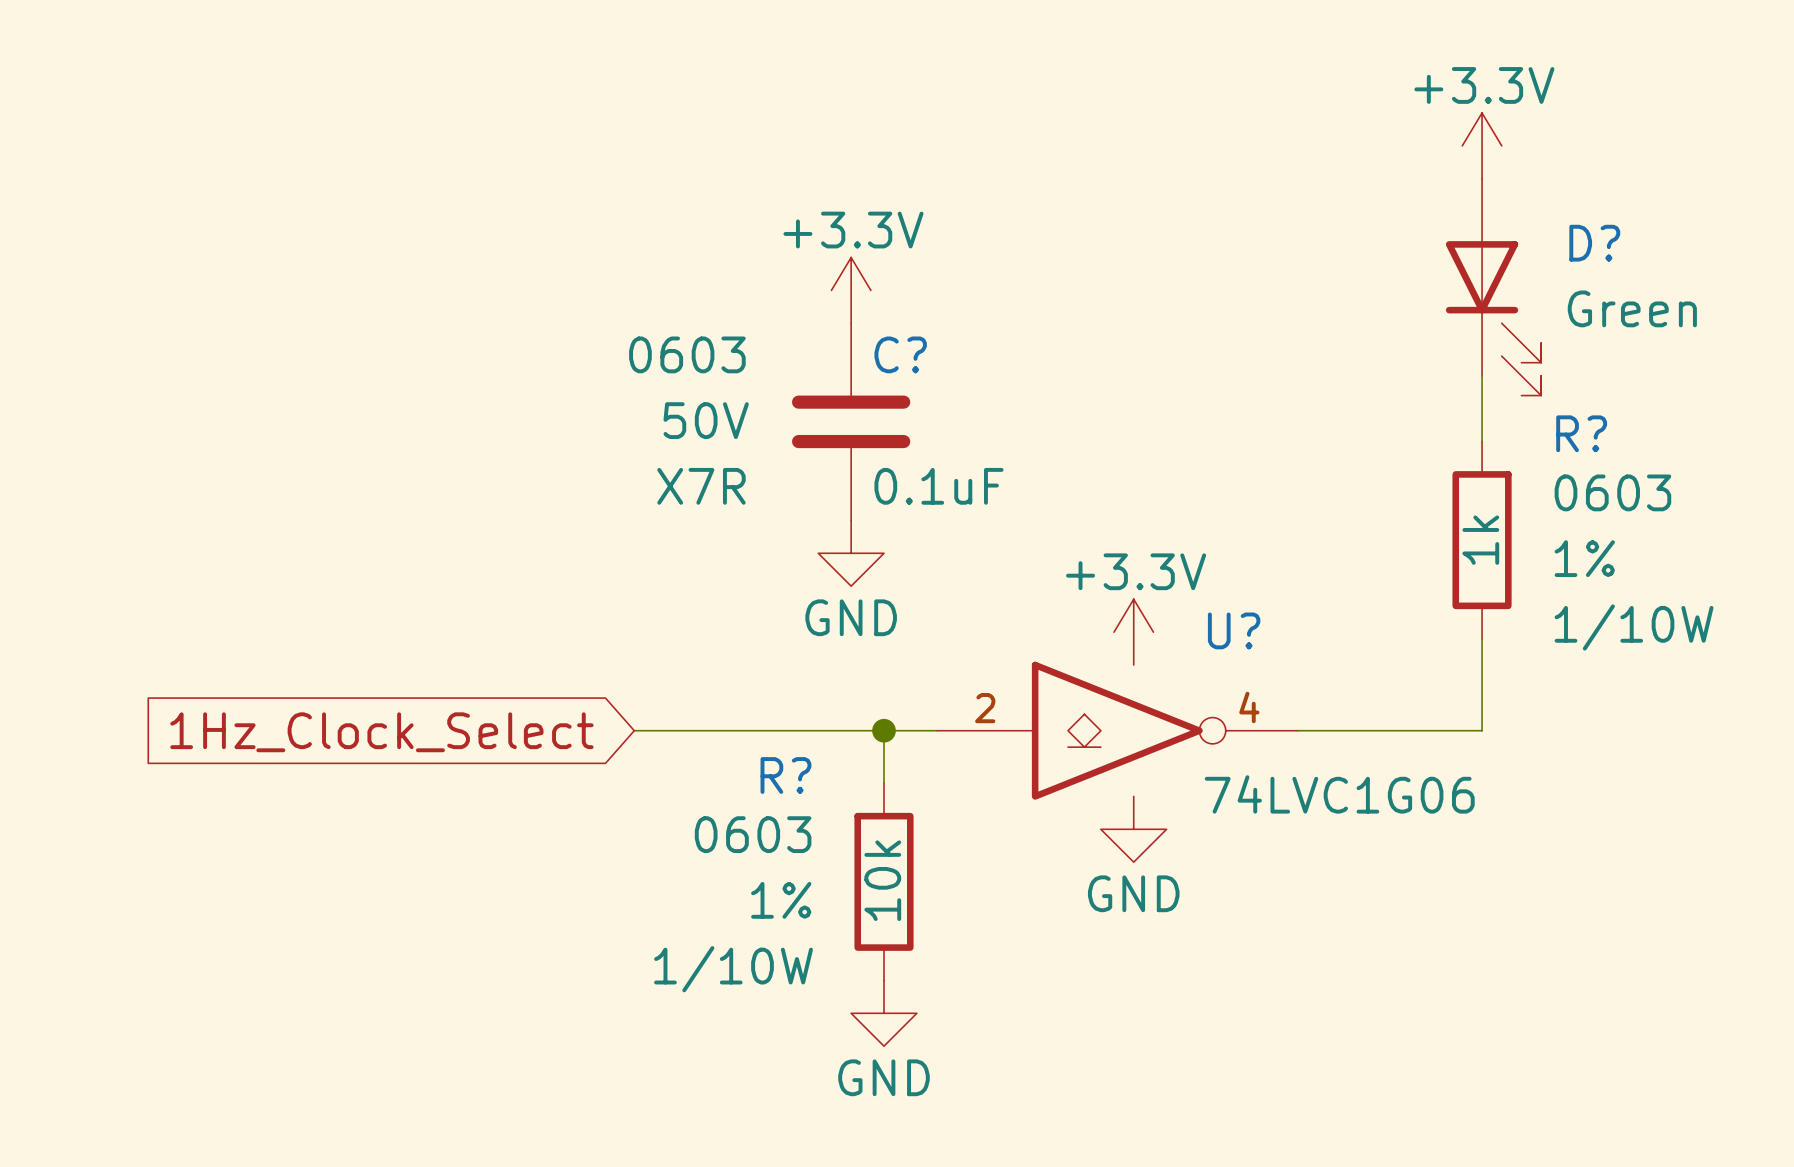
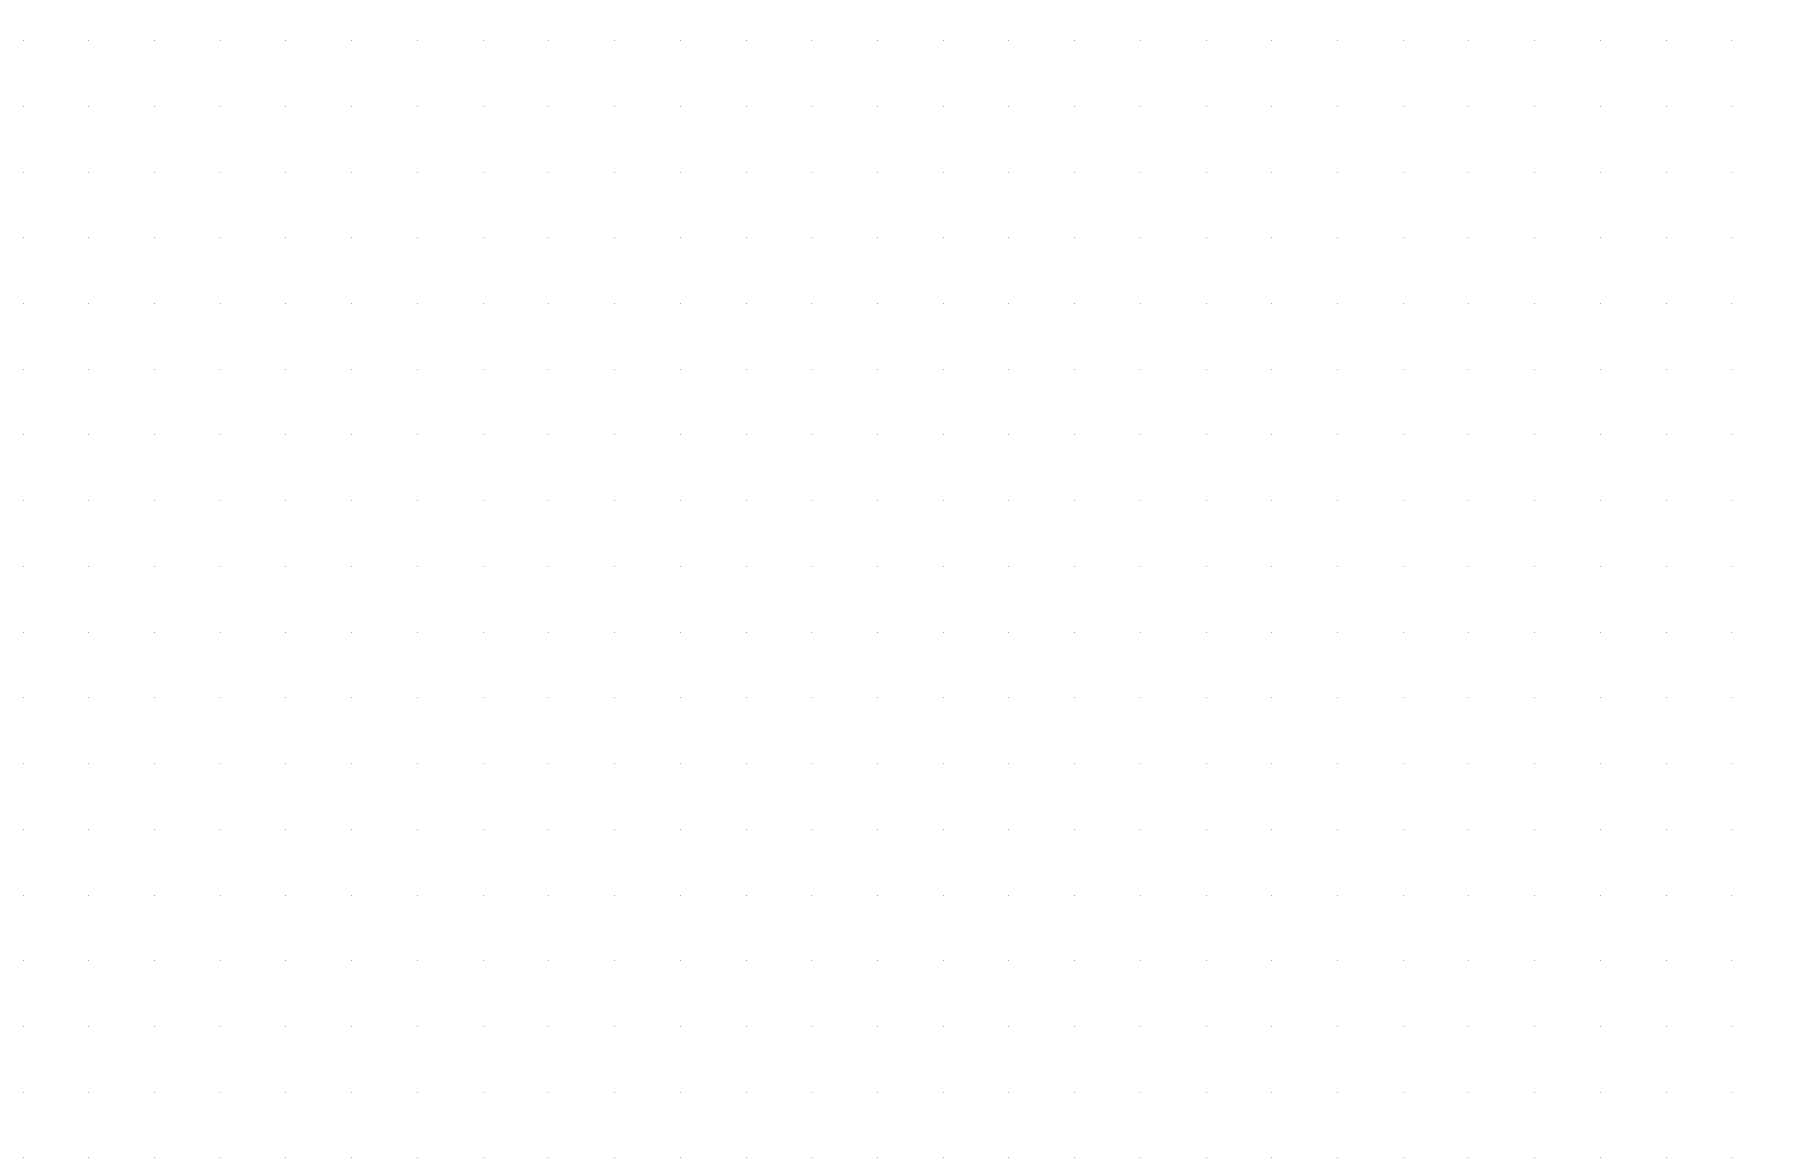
power symbol: +3.3V (1482, 145) -> none
D?: Green (1493, 287) -> none
power symbol: +3.3V (851, 290) -> none
wire: (1482, 375) (1482, 441) -> none
C?: 0.1uF (851, 421) -> none
R?: 1k (1482, 540) -> none
power symbol: GND (851, 553) -> none
power symbol: +3.3V (1133, 632) -> none
wire: (1482, 638) (1482, 730) (1298, 730) -> none
wire: (634, 730) (936, 730) -> none
wire: (884, 730) (884, 783) -> none
junction: (884, 730) -> none
U?: 74LVC1G06 (1117, 730) -> none
global label: 1Hz_Clock_Select (381, 732) -> none
power symbol: GND (1133, 829) -> none
R?: 10k (884, 881) -> none
power symbol: GND (884, 1013) -> none

